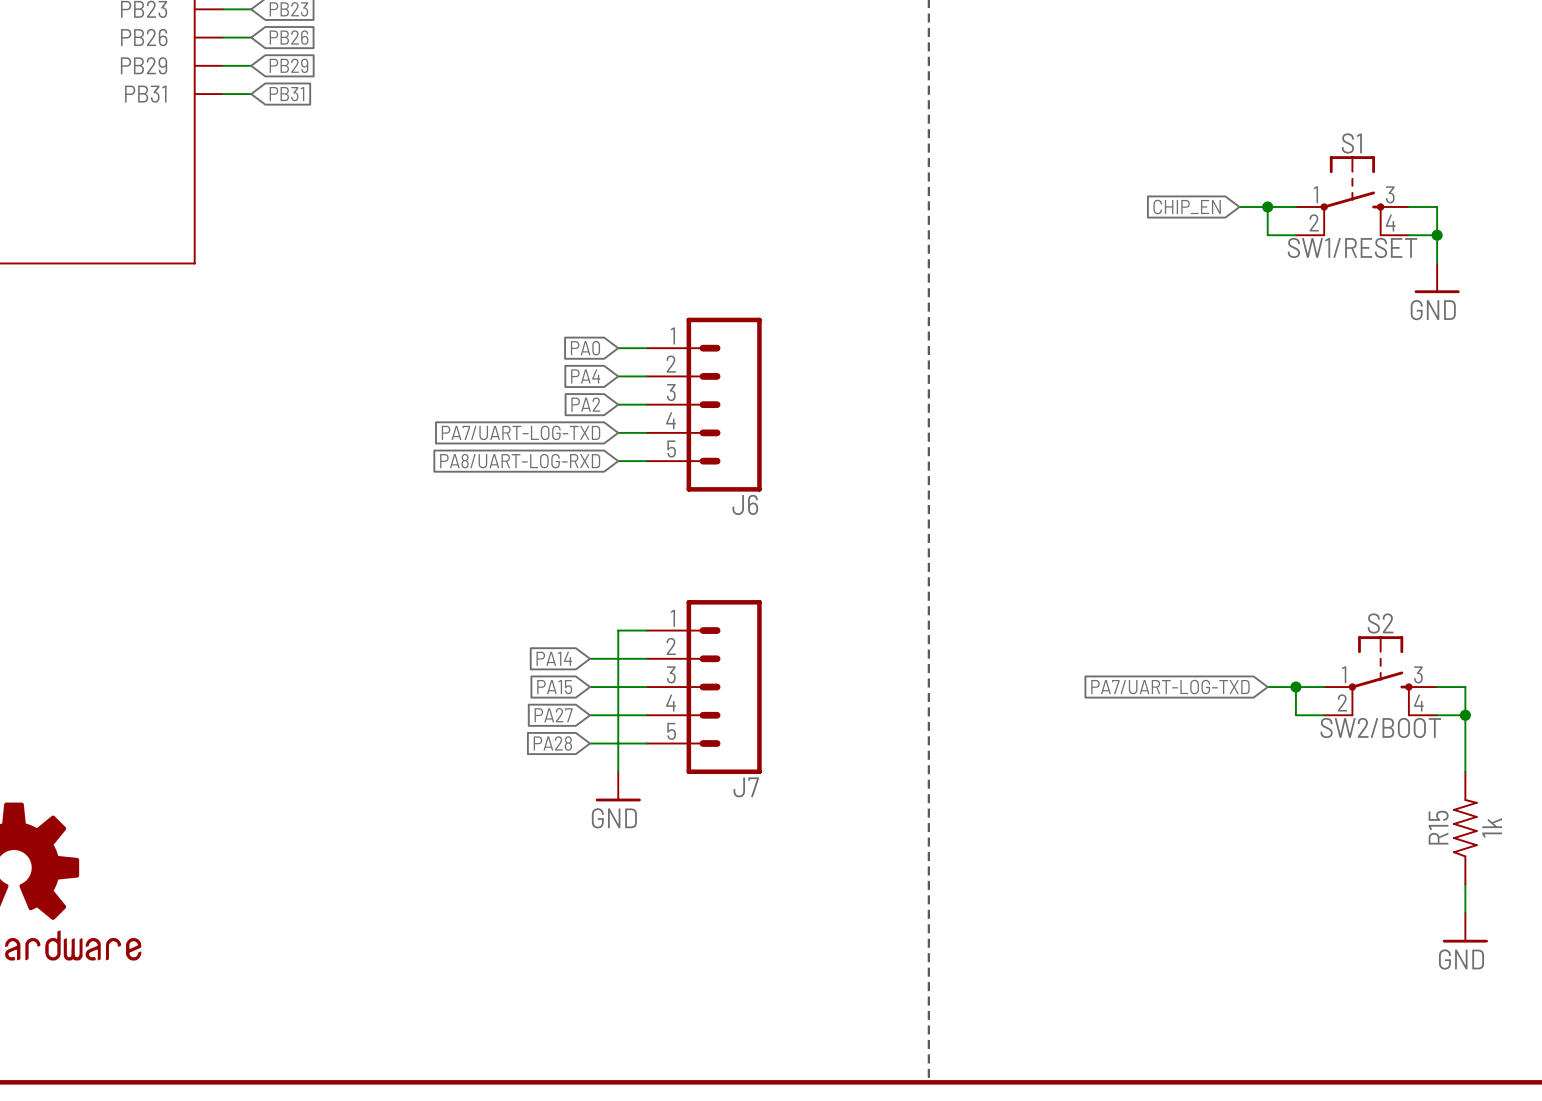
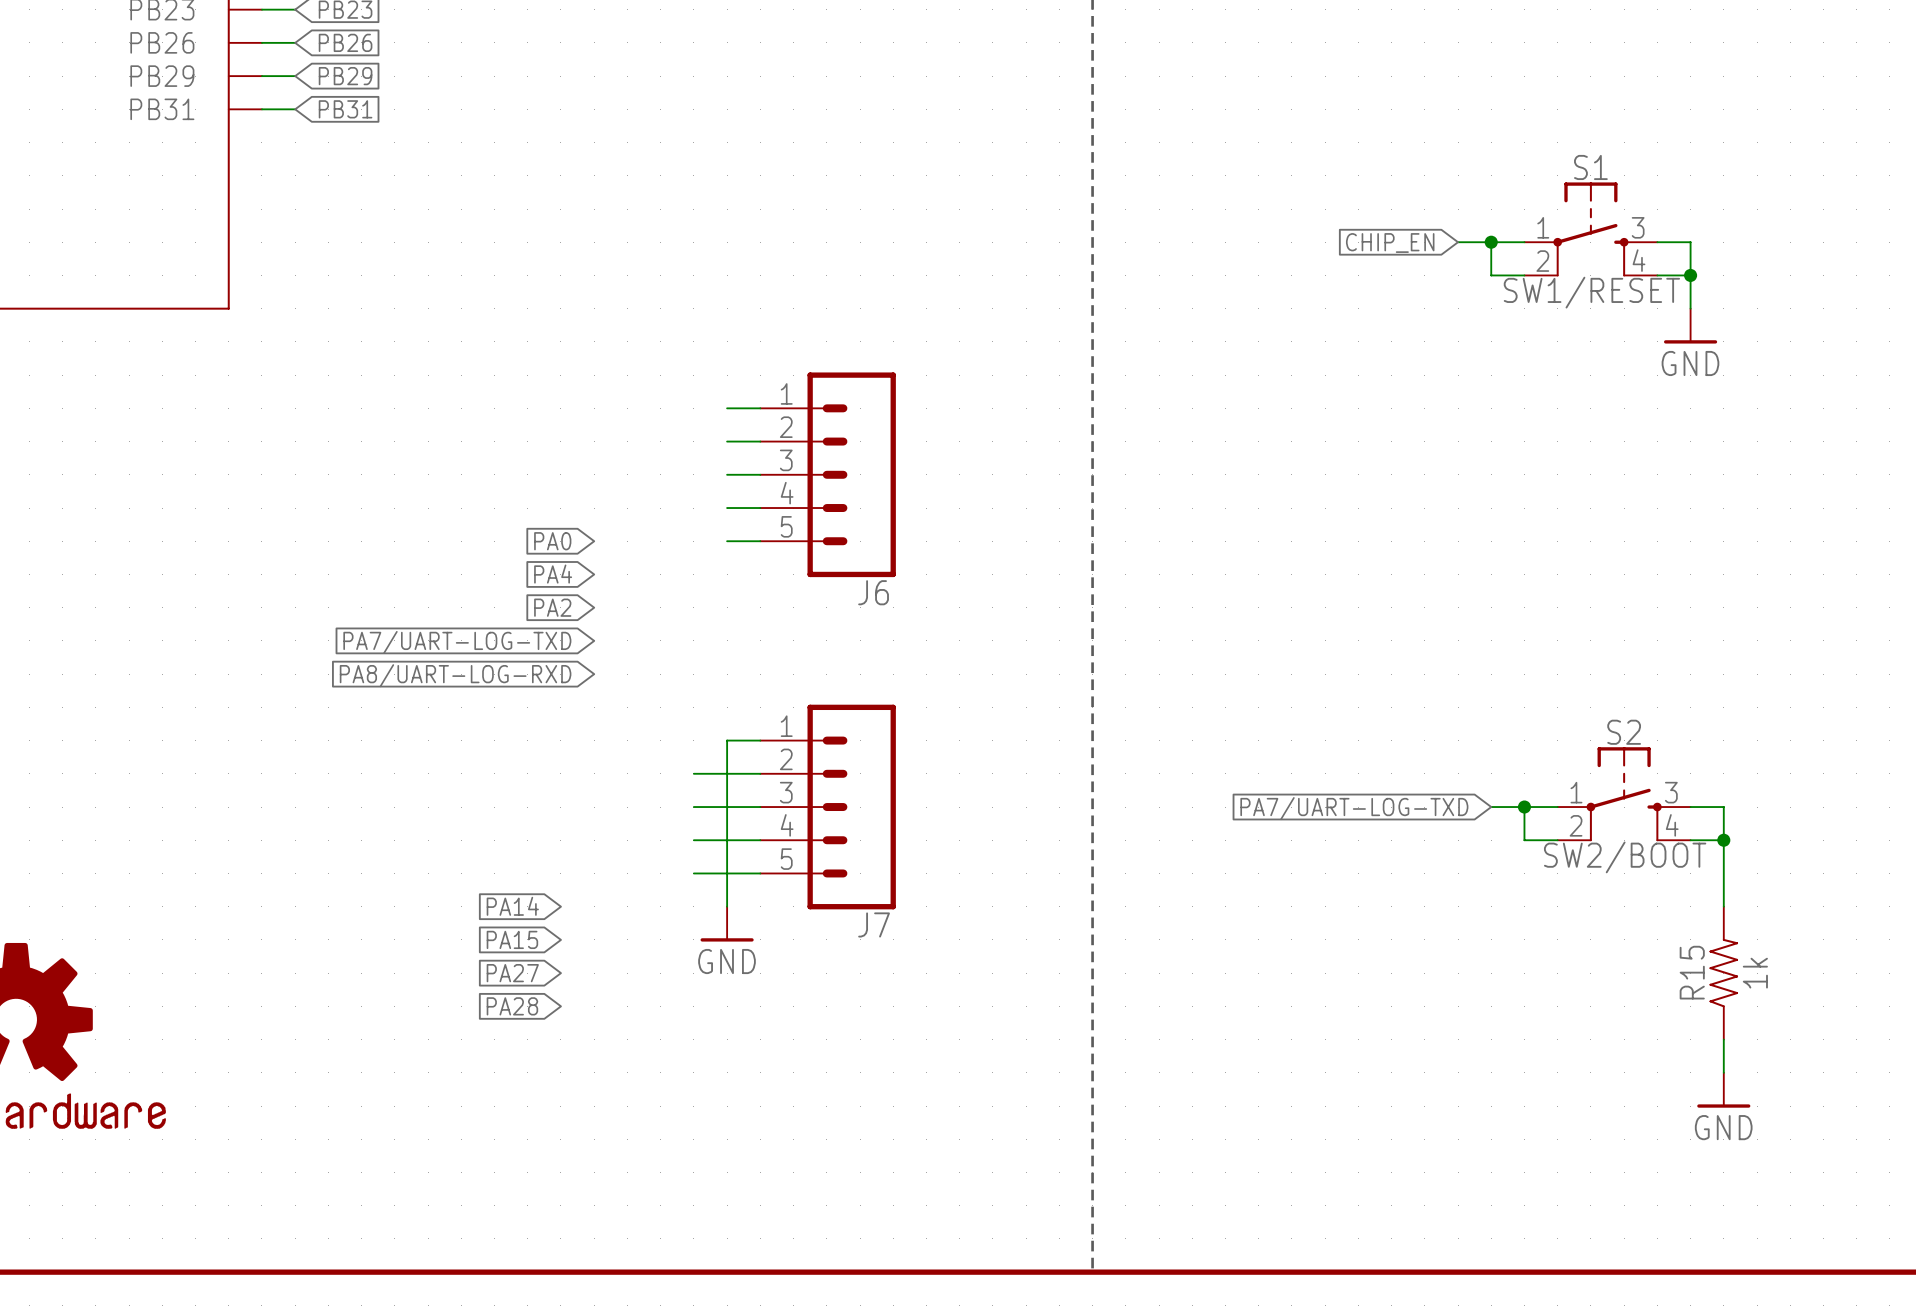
global label position: PA0 (585, 348) -> PA0 (552, 541)
global label position: PA4 (585, 376) -> PA4 (553, 574)
global label position: PA2 (585, 404) -> PA2 (552, 607)
global label position: PA7/UART-LOG-TXD (520, 432) -> PA7/UART-LOG-TXD (457, 642)
global label position: PA8/UART-LOG-RXD (520, 461) -> PA8/UART-LOG-RXD (455, 675)
global label position: PA14 (554, 658) -> PA14 (512, 906)
global label position: PA15 (554, 687) -> PA15 (512, 939)
global label position: PA27 (553, 715) -> PA27 (512, 973)
global label position: PA28 (552, 743) -> PA28 (512, 1006)

